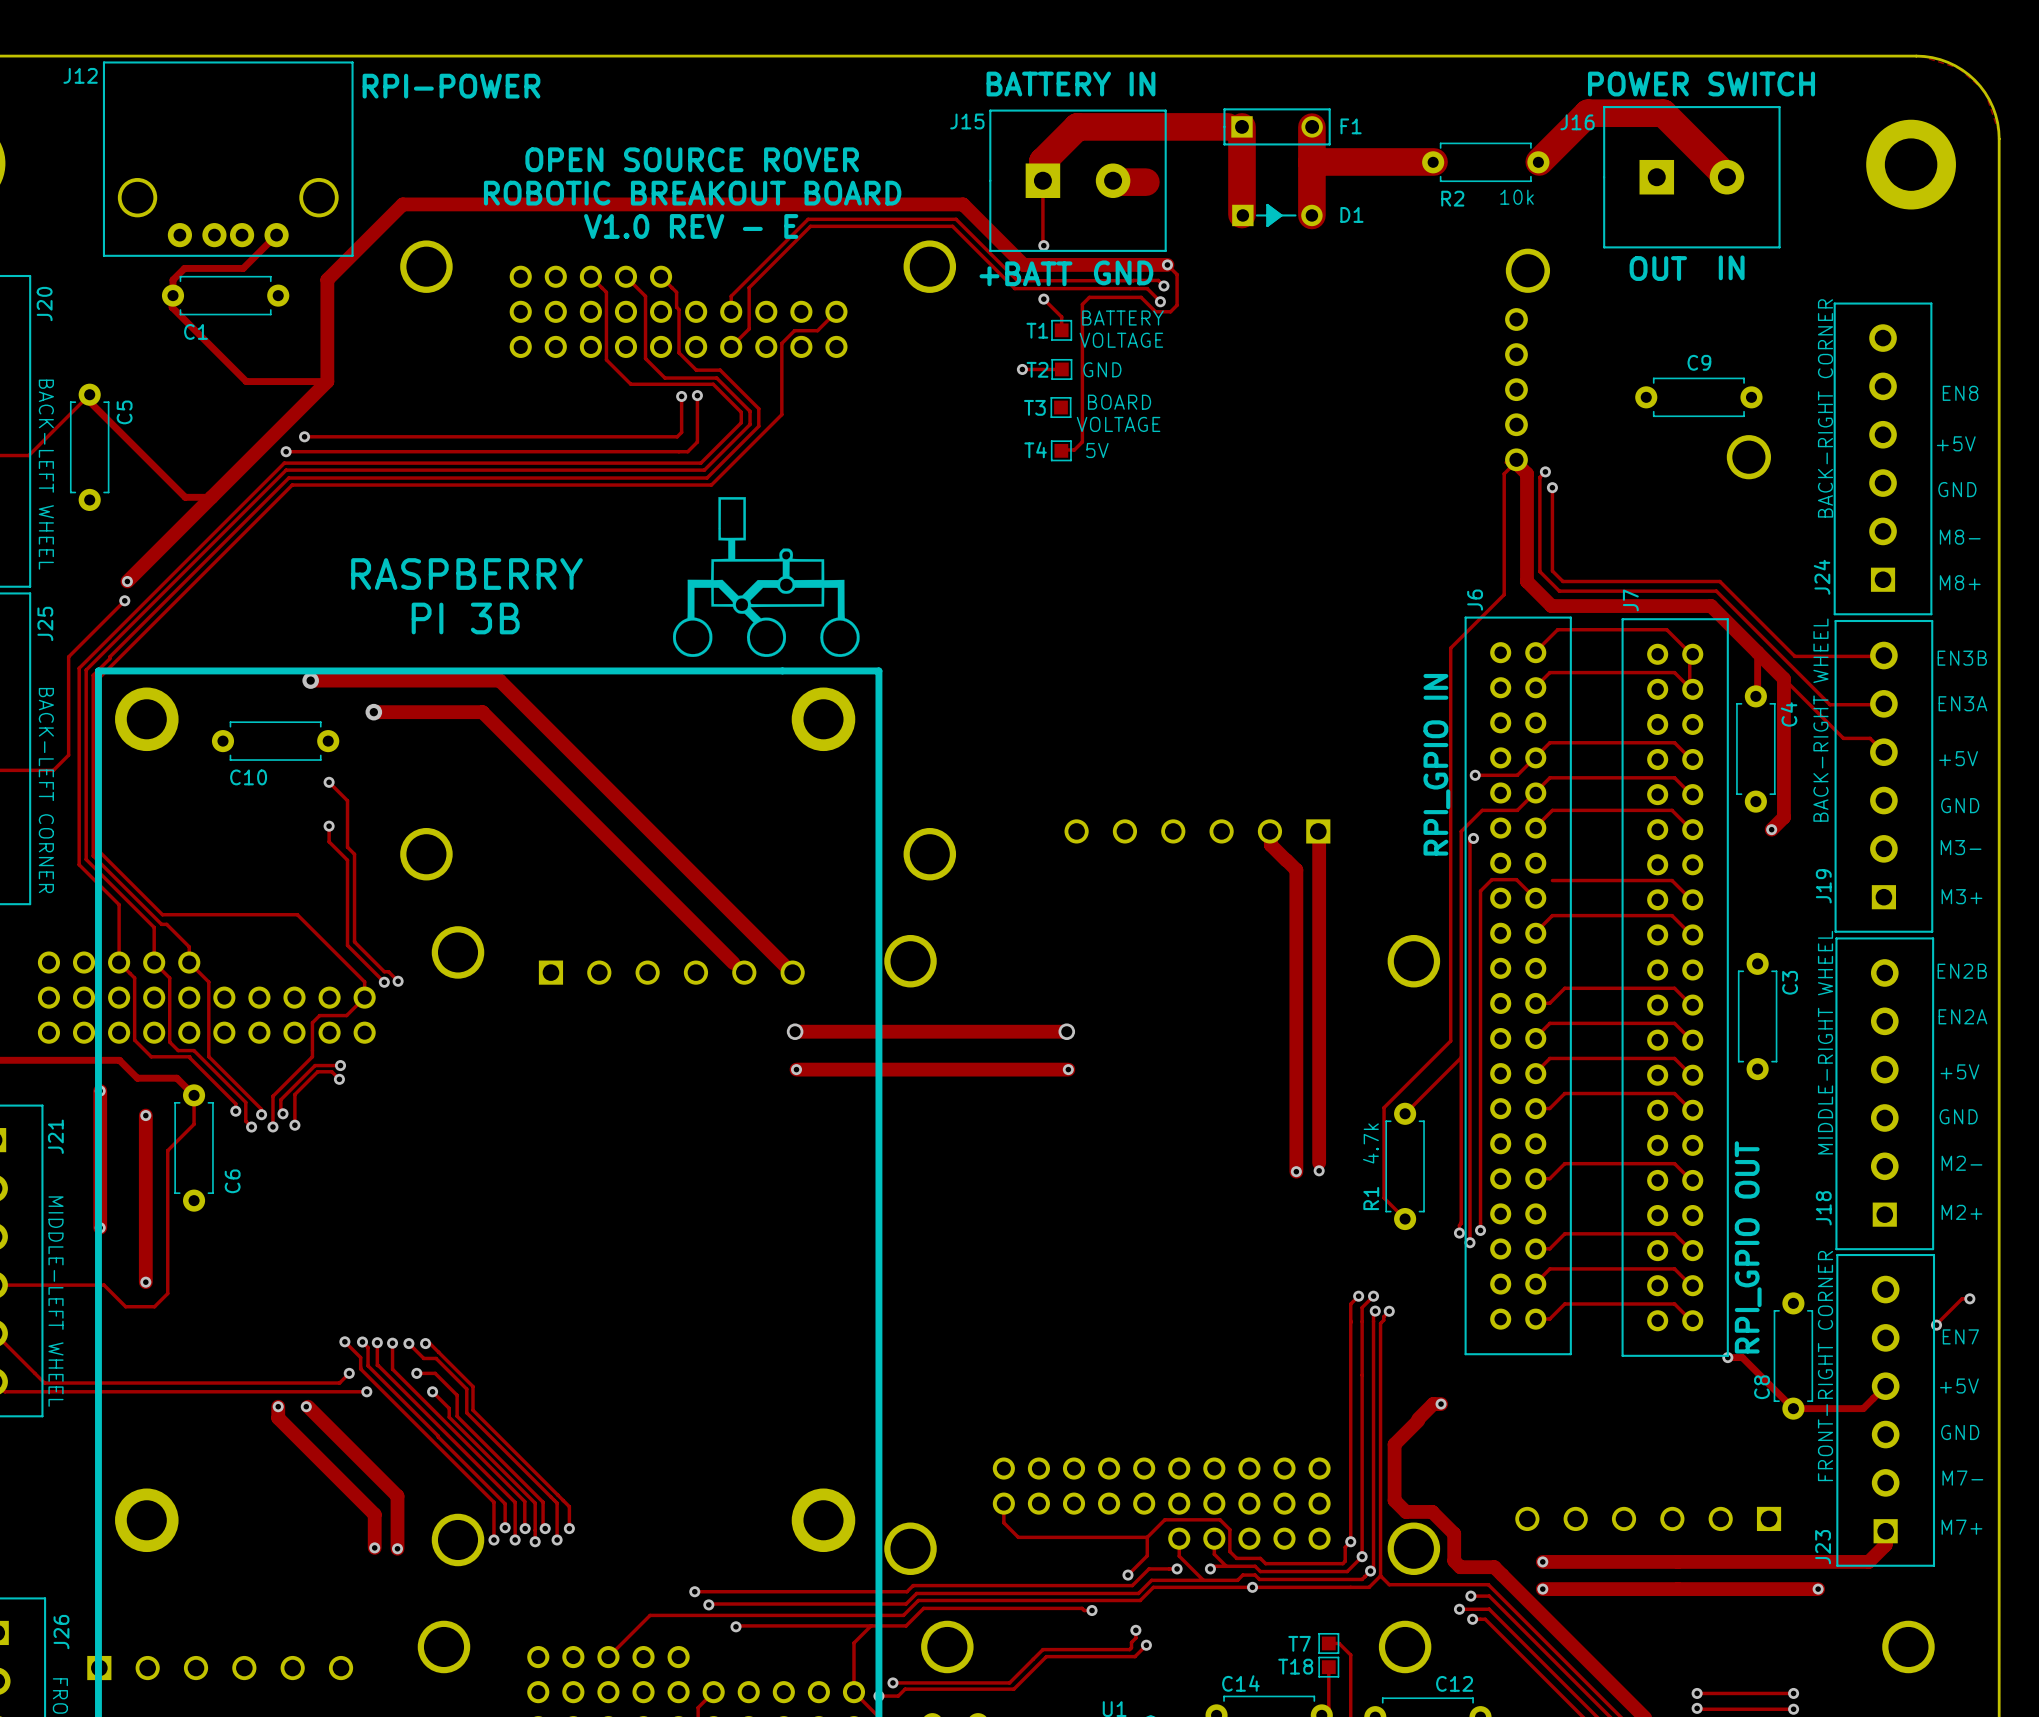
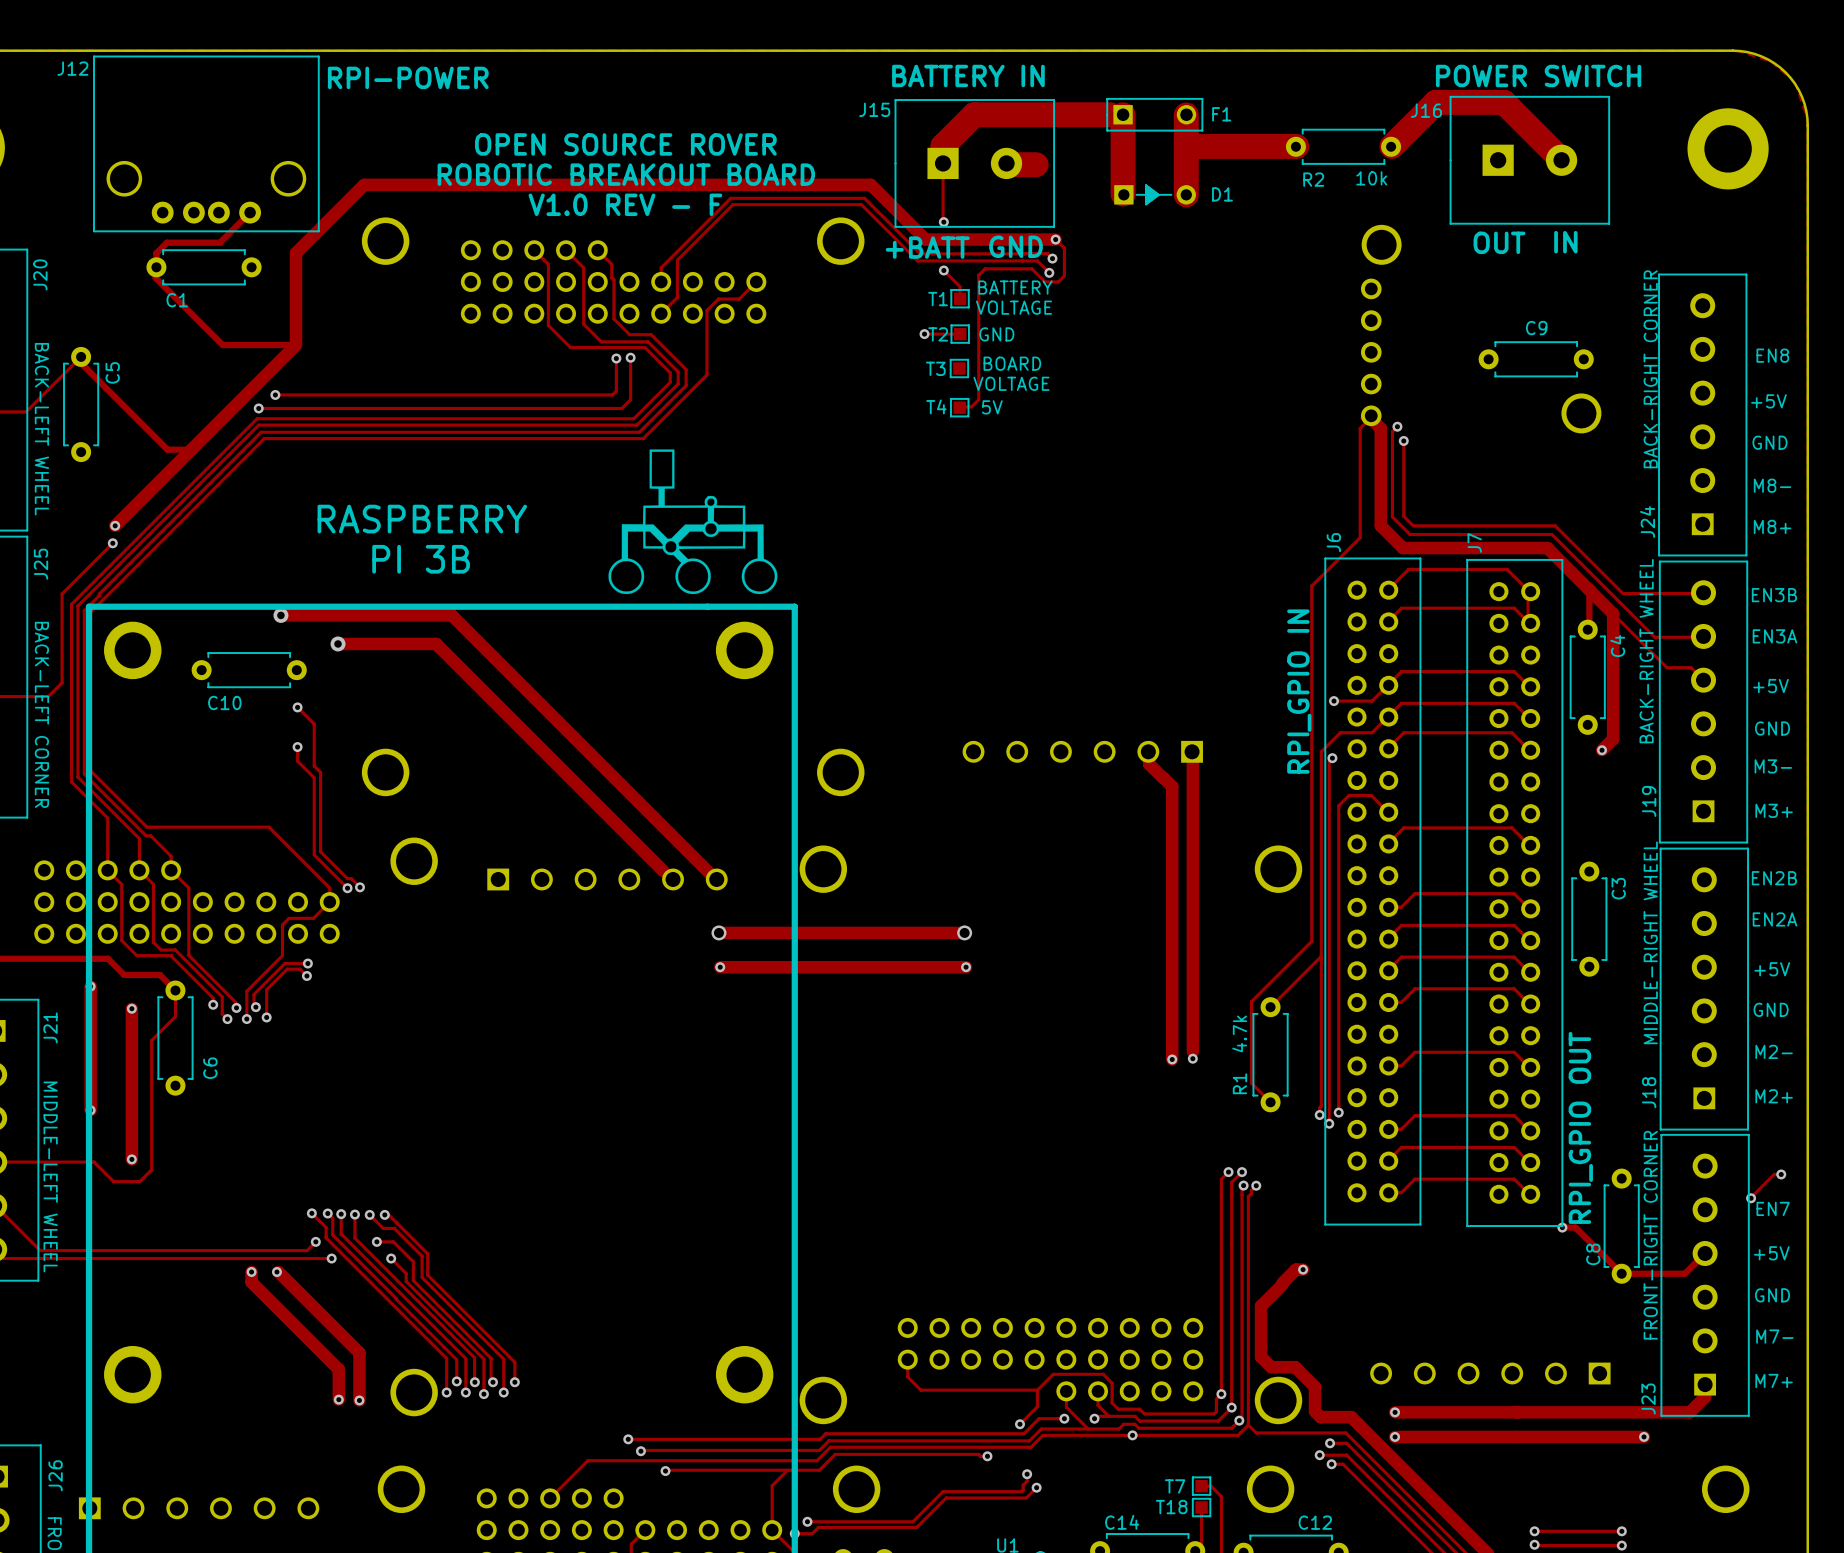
text: V1.0 REV - E (691, 226) -> V1.0 REV - F (625, 204)
track: (1552, 880) (1672, 880) (1689, 898) -> none

